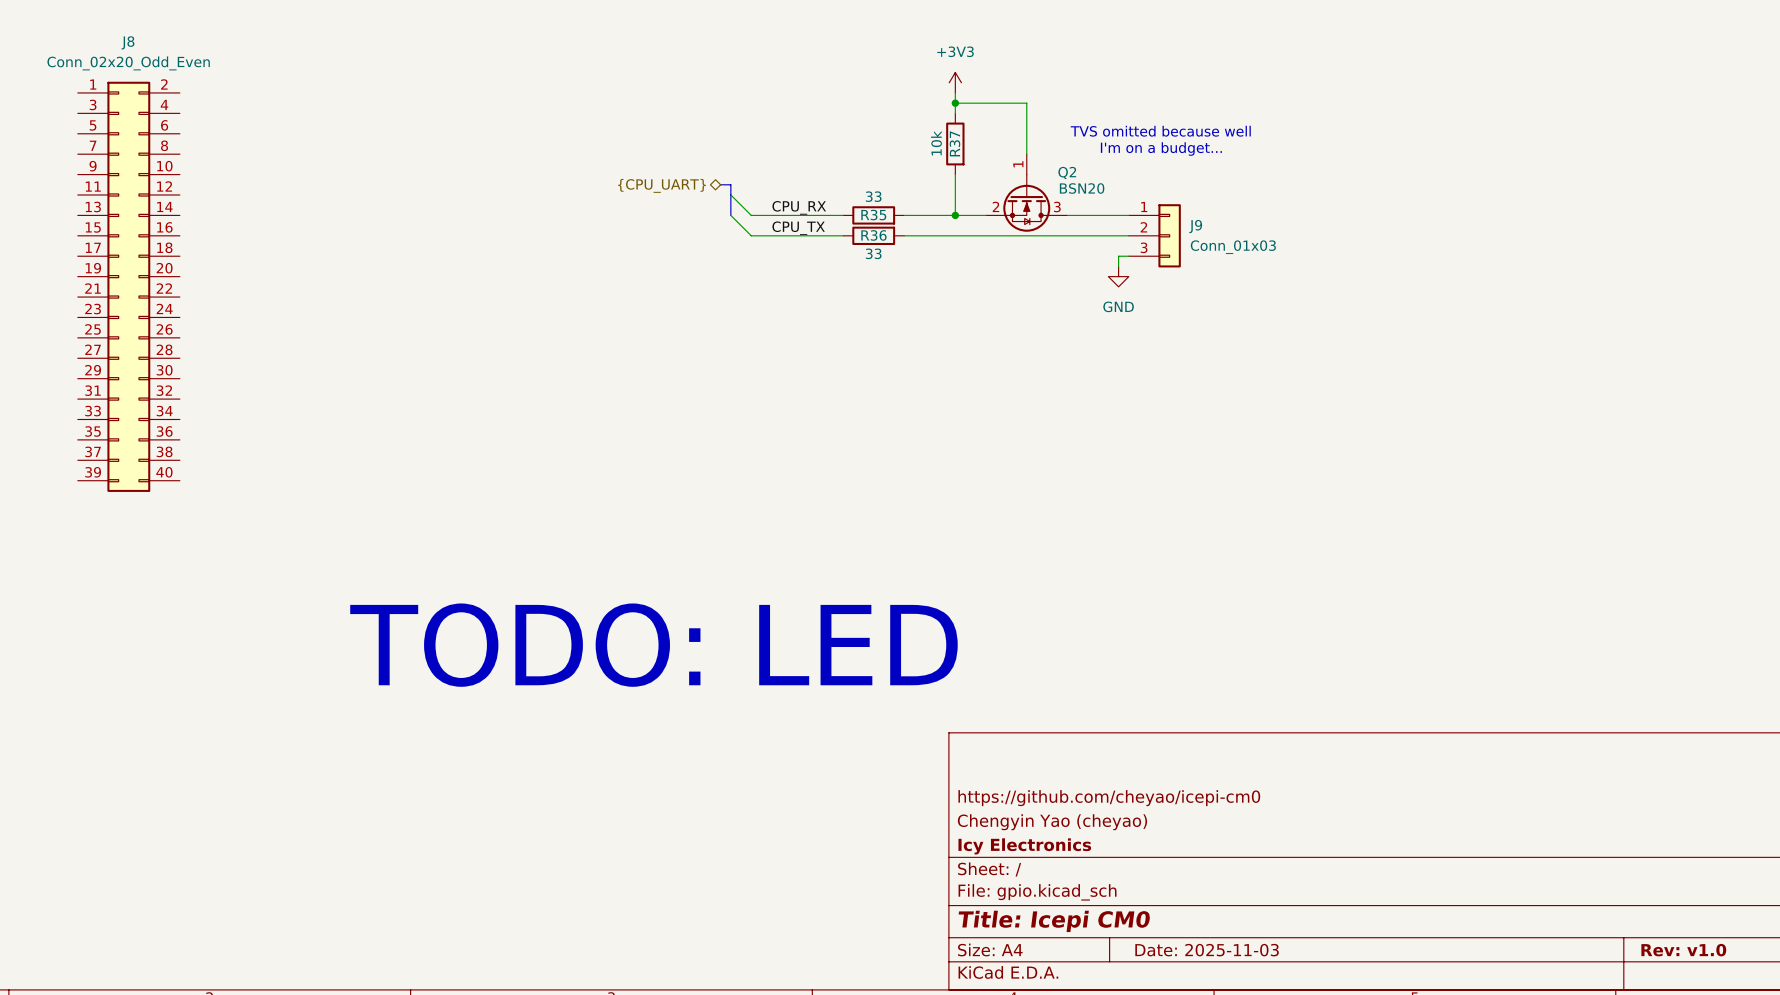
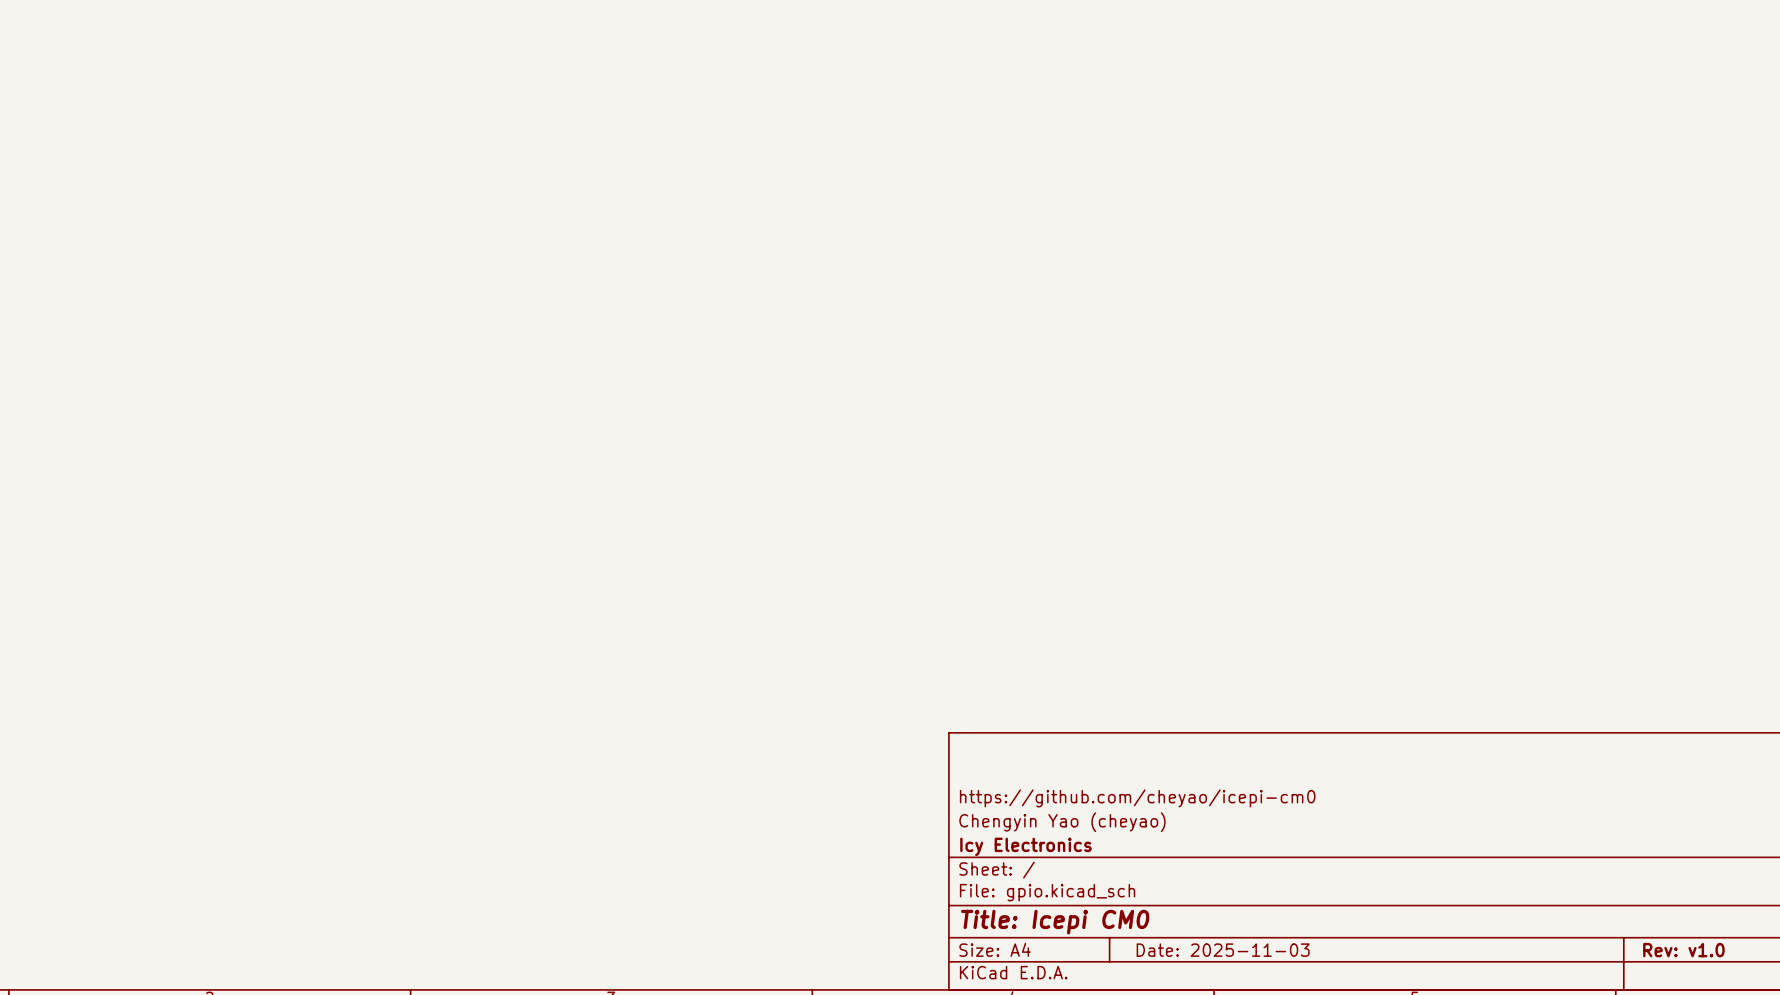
power symbol: +3V3 (955, 82) -> none
wire: (955, 92) (955, 113) -> none
wire: (955, 103) (1026, 103) (1026, 154) -> none
junction: (955, 103) -> none
text: TVS omitted because well (1160, 131) -> none
R37: 10k (955, 143) -> none
text: I'm on a budget... (1161, 149) -> none
wire: (955, 174) (955, 215) -> none
bus: (720, 184) (730, 184) (730, 215) -> none
hierarchical label: {CPU_UART} (662, 185) -> none
Q2: BSN20 (1026, 192) -> none
wire: (730, 195) (751, 215) (843, 215) -> none
label: CPU_RX (799, 207) -> none
wire: (730, 215) (751, 235) (843, 235) -> none
R35: 33 (873, 215) -> none
wire: (904, 215) (985, 215) -> none
junction: (955, 215) -> none
wire: (1067, 215) (1128, 215) -> none
label: CPU_TX (798, 228) -> none
R36: 33 (873, 235) -> none
wire: (904, 235) (1128, 235) -> none
J9: Conn_01x03 (1154, 235) -> none
wire: (1128, 256) (1118, 256) (1118, 266) -> none
power symbol: GND (1118, 276) -> none
J8: Conn_02x20_Odd_Even (128, 286) -> none
text: TODO: LED (653, 645) -> none

